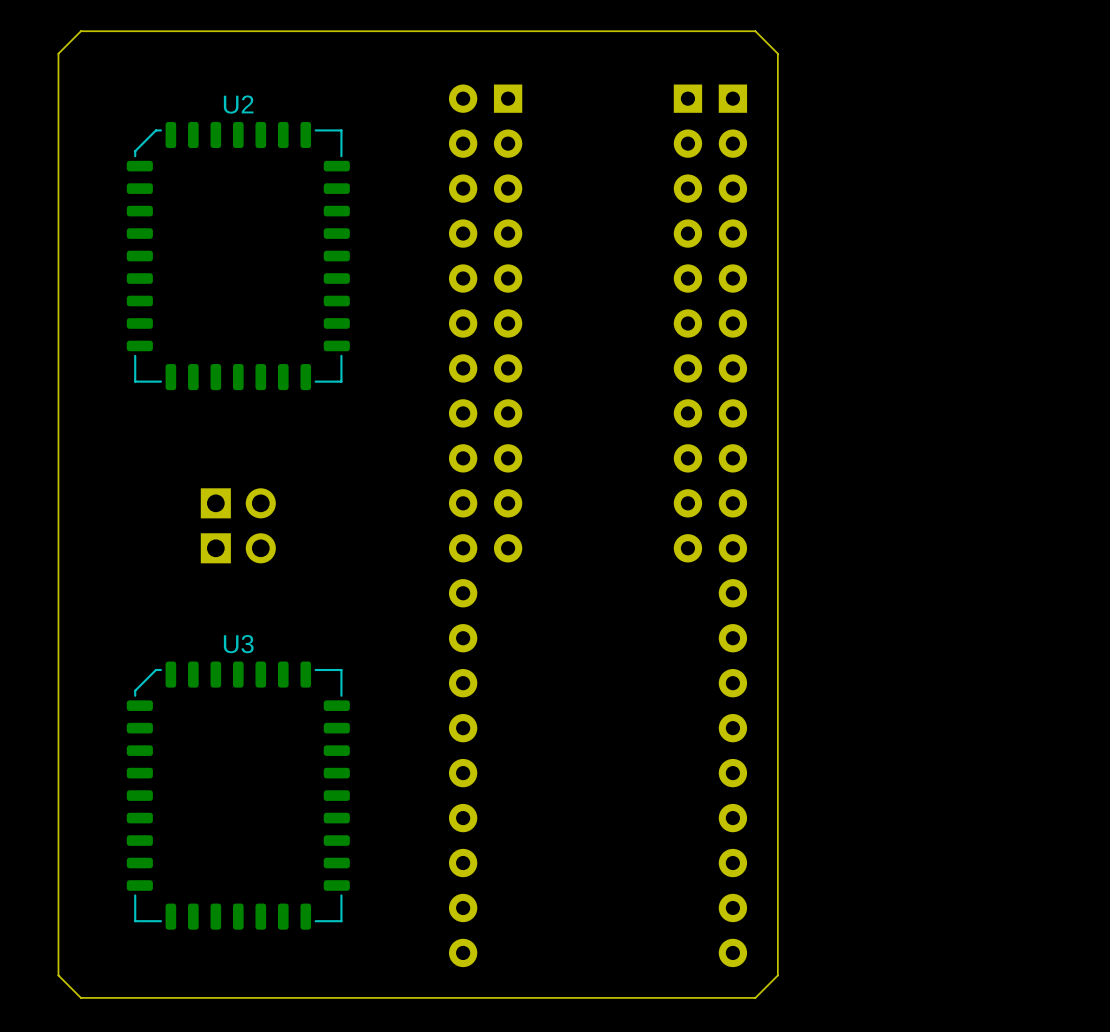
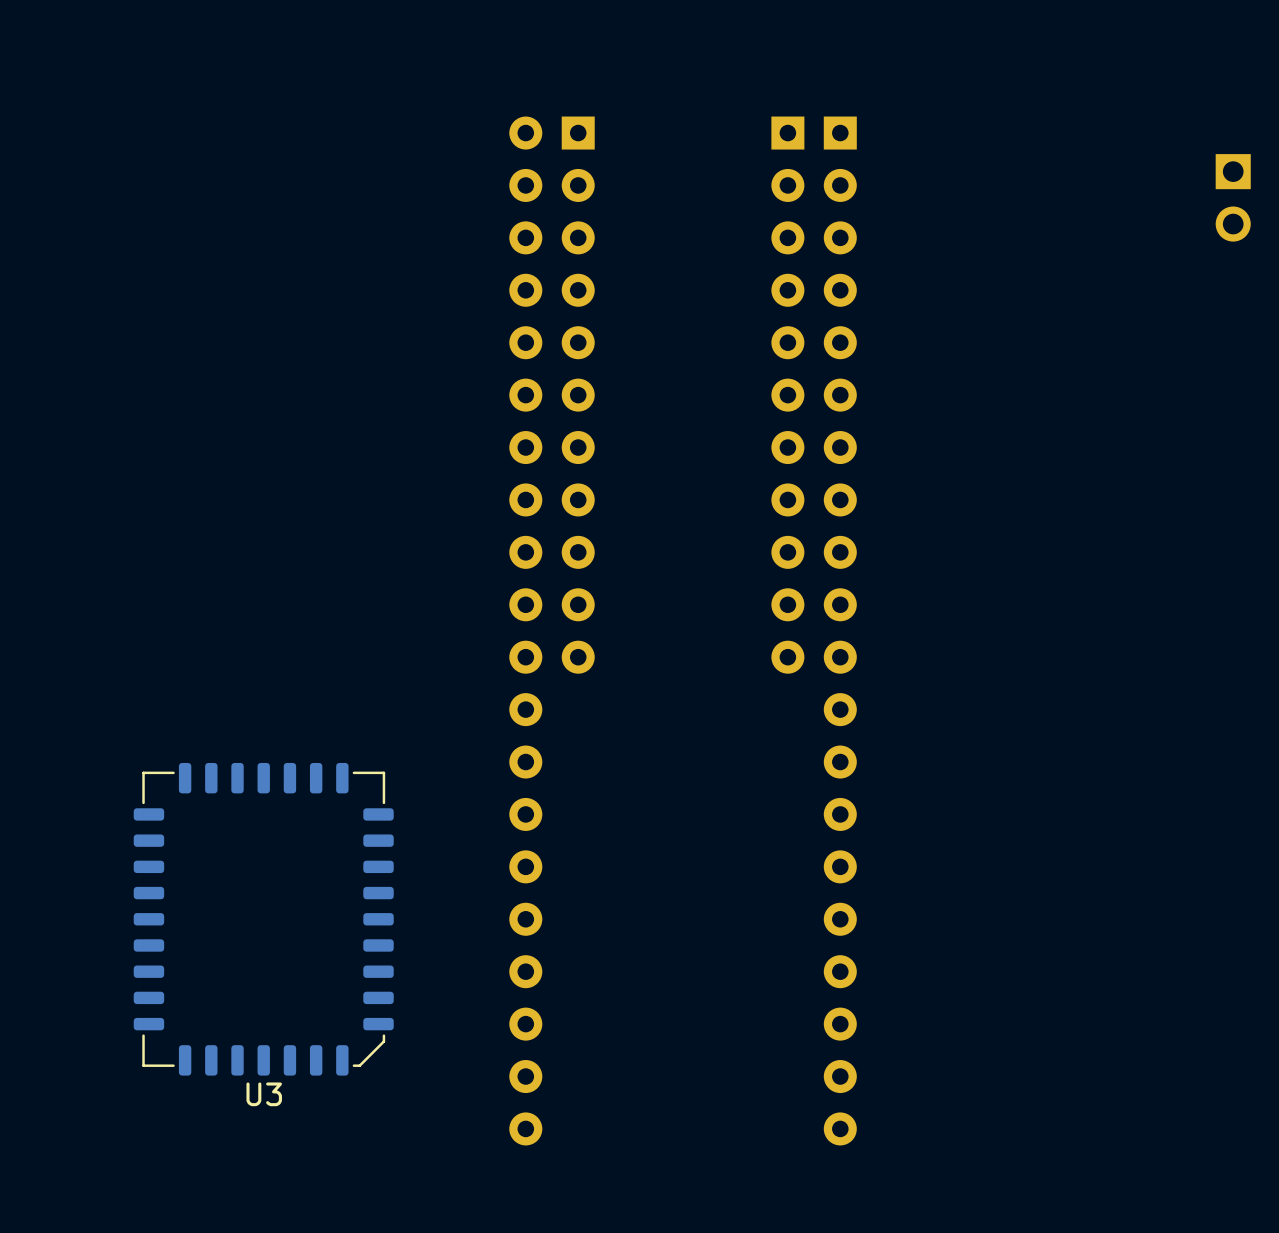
board edge: (755, 31) (777, 53) (777, 975) (755, 997) (80, 997) (58, 975) (58, 53) (80, 31) (755, 31) -> none
part: none -> (1233, 197)
U2: (238, 256) -> none
part: (238, 503) -> none
part: (238, 548) -> none
U3 rotation: 0° (238, 795) -> 180° (263, 919)

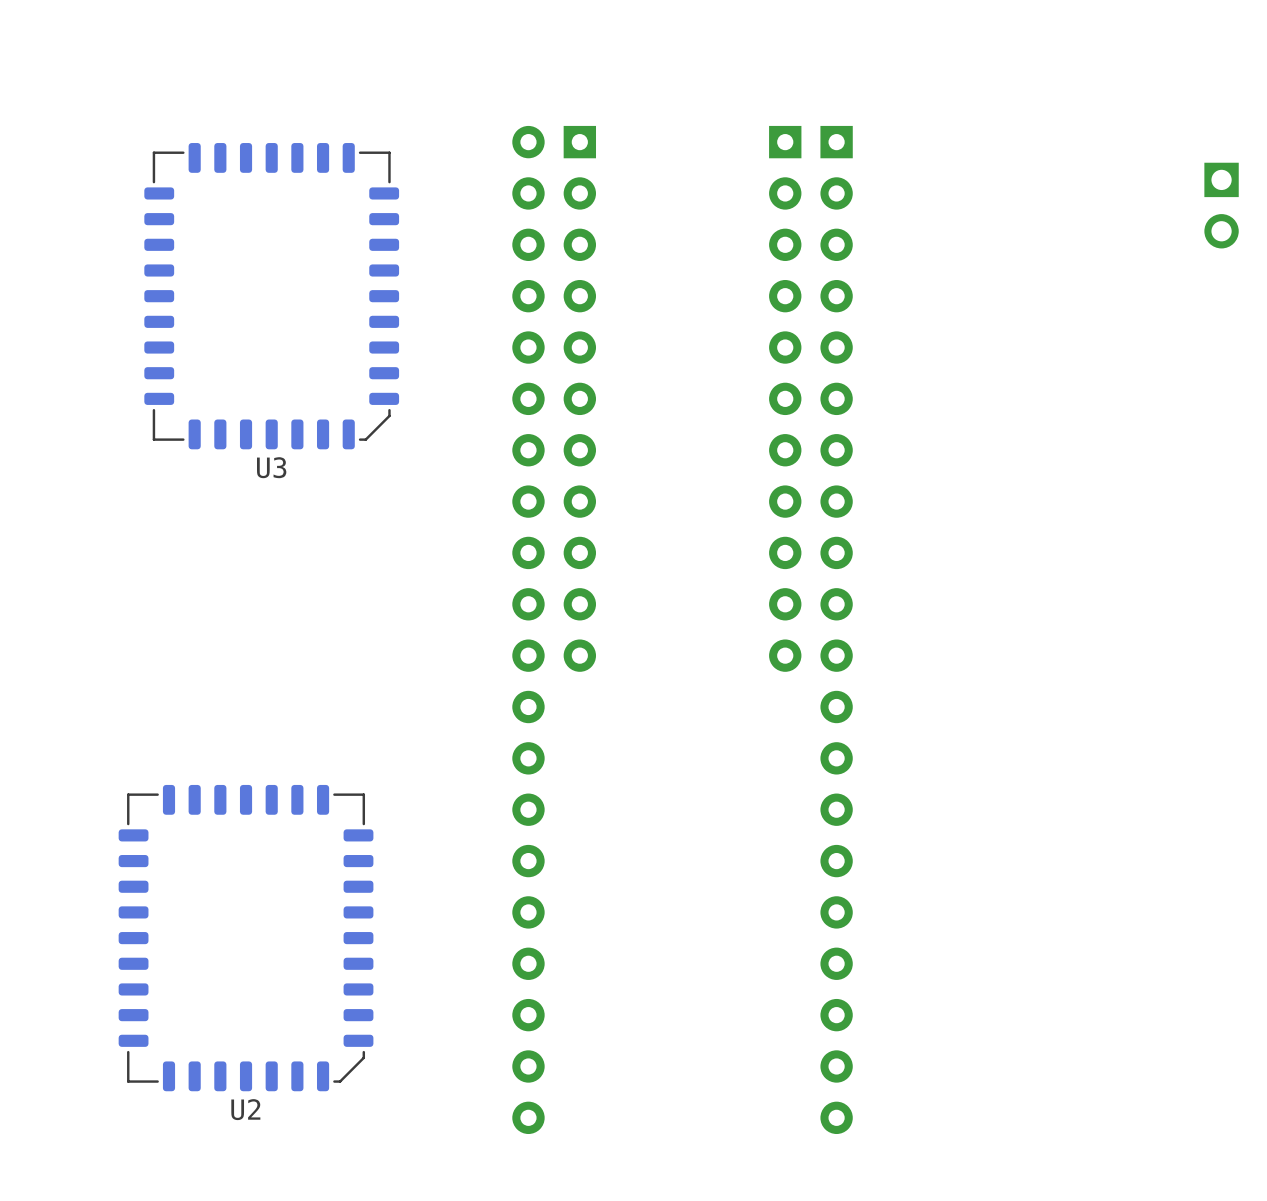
U3 position: (263, 919) -> (271, 296)
U2: none -> (246, 938)

